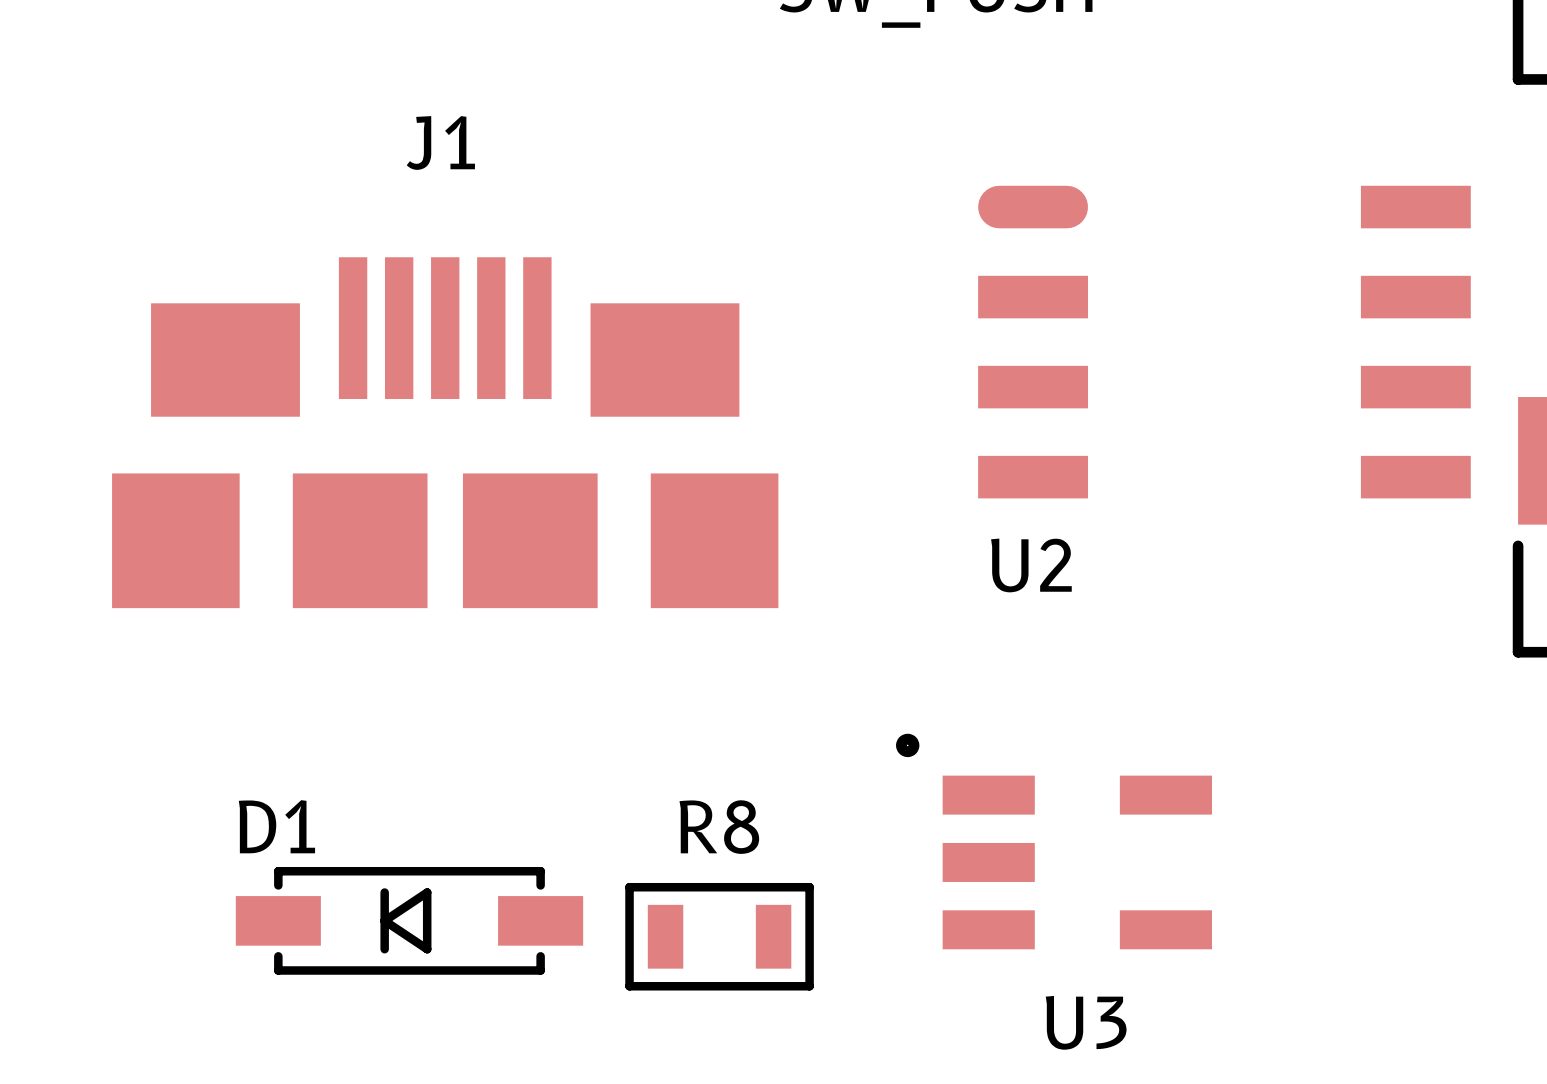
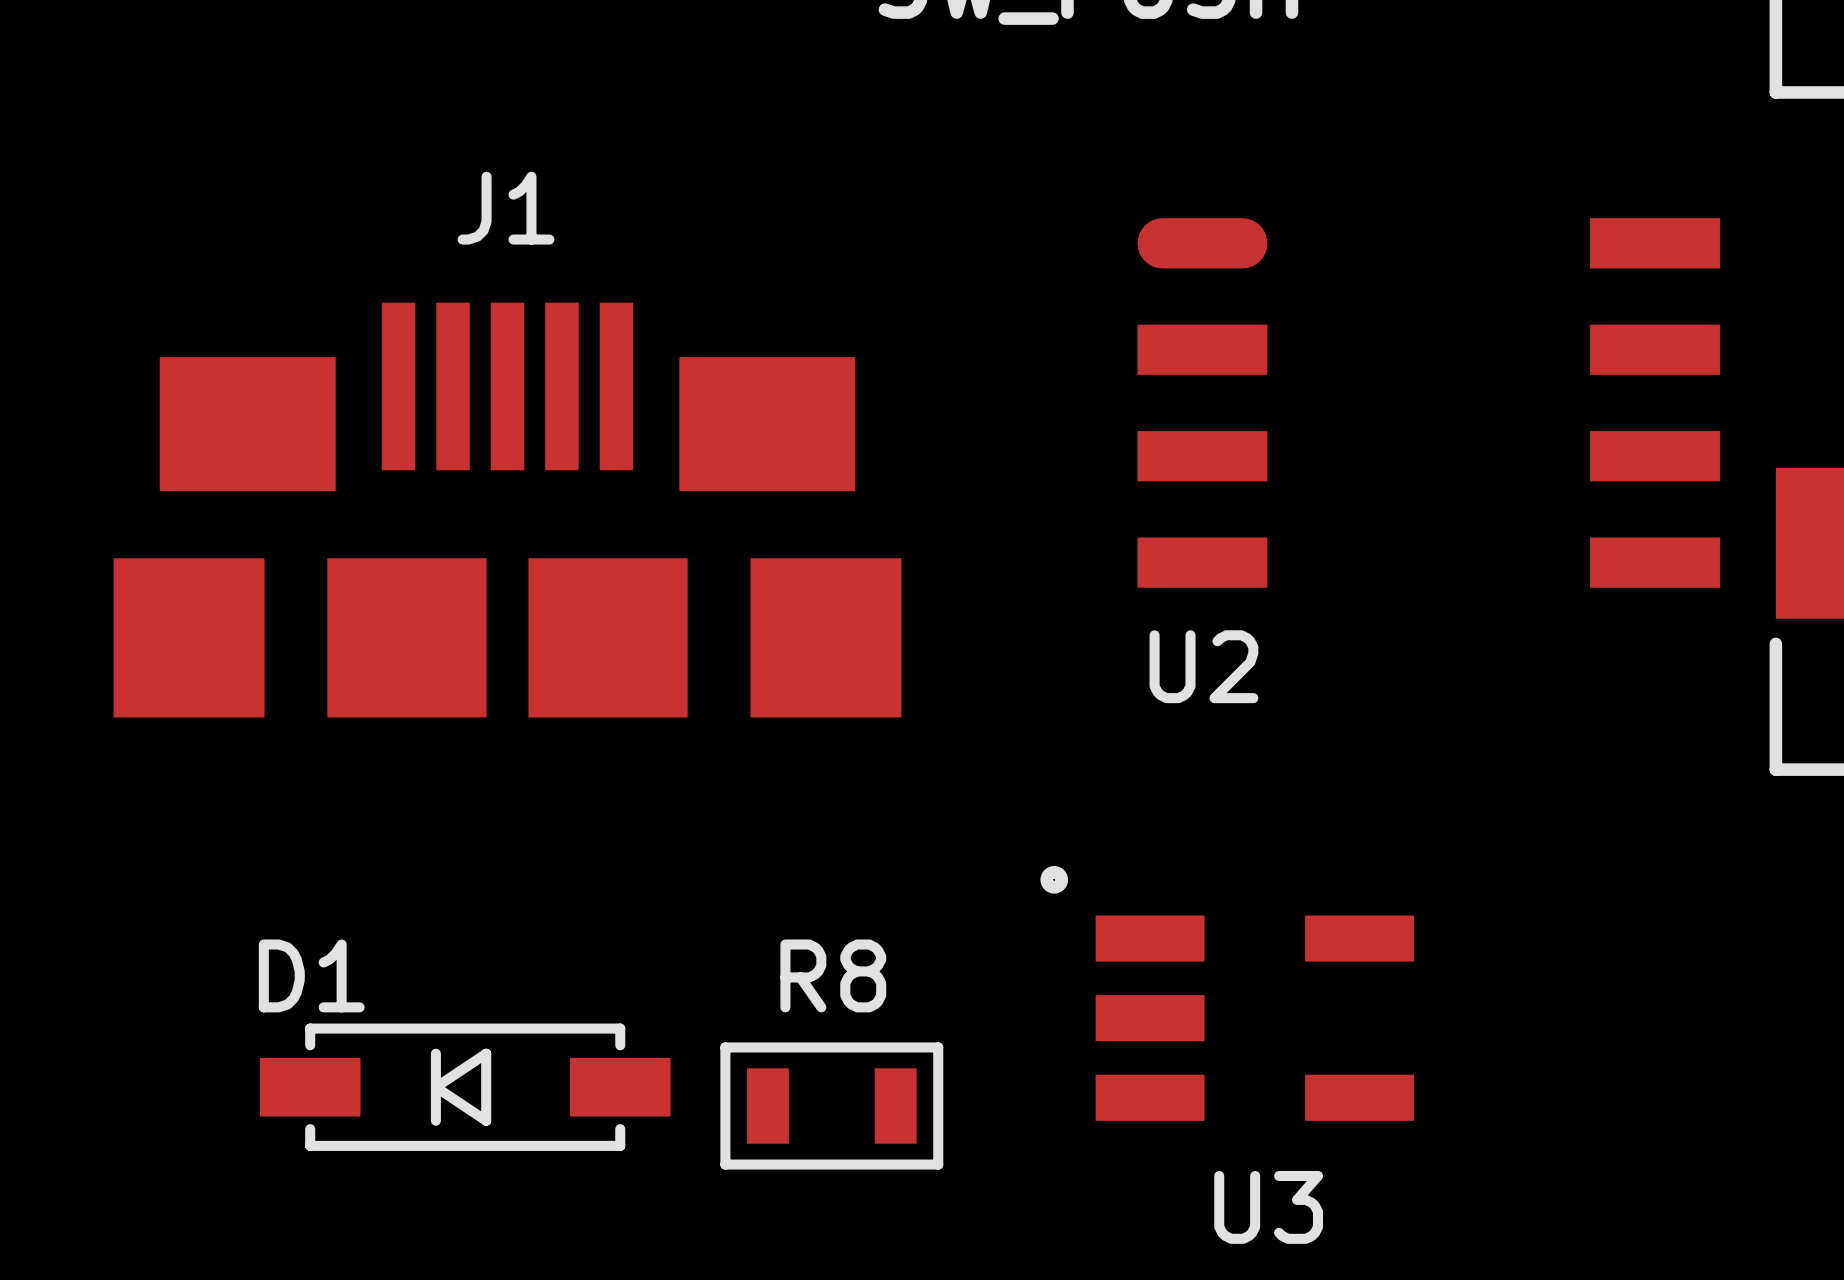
J1 name position: J1 (440, 142) -> J1 (506, 208)

